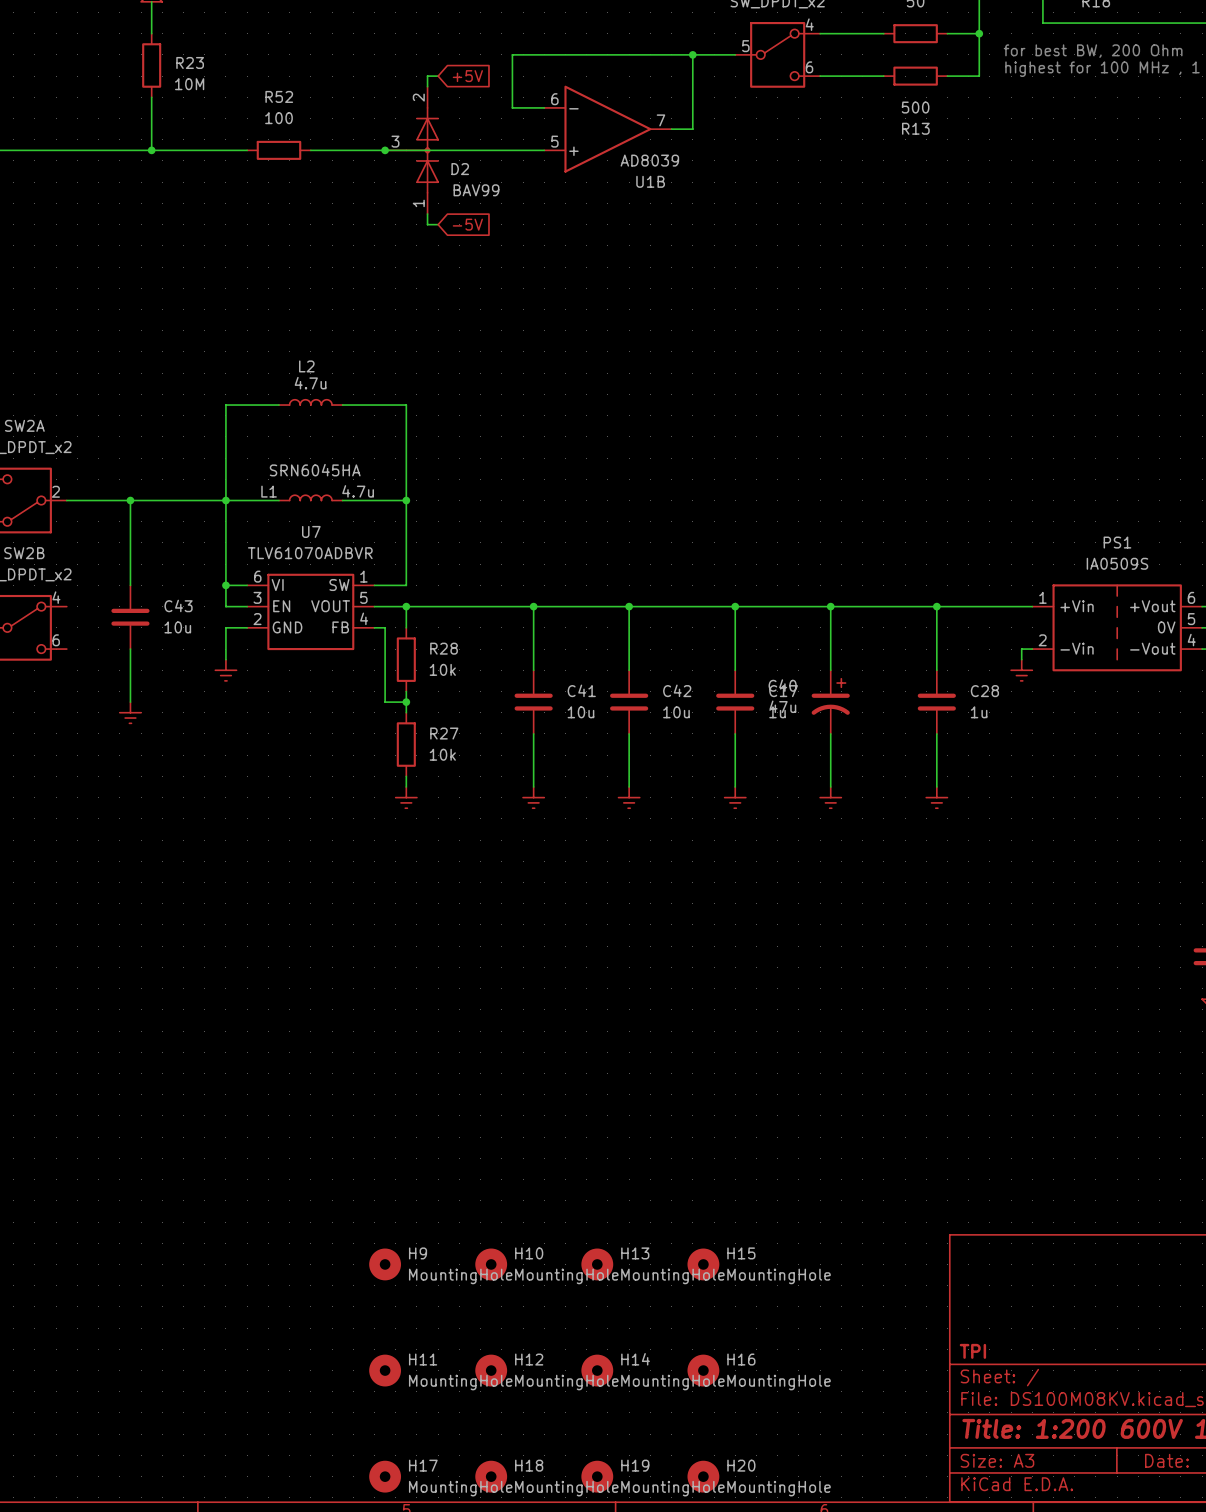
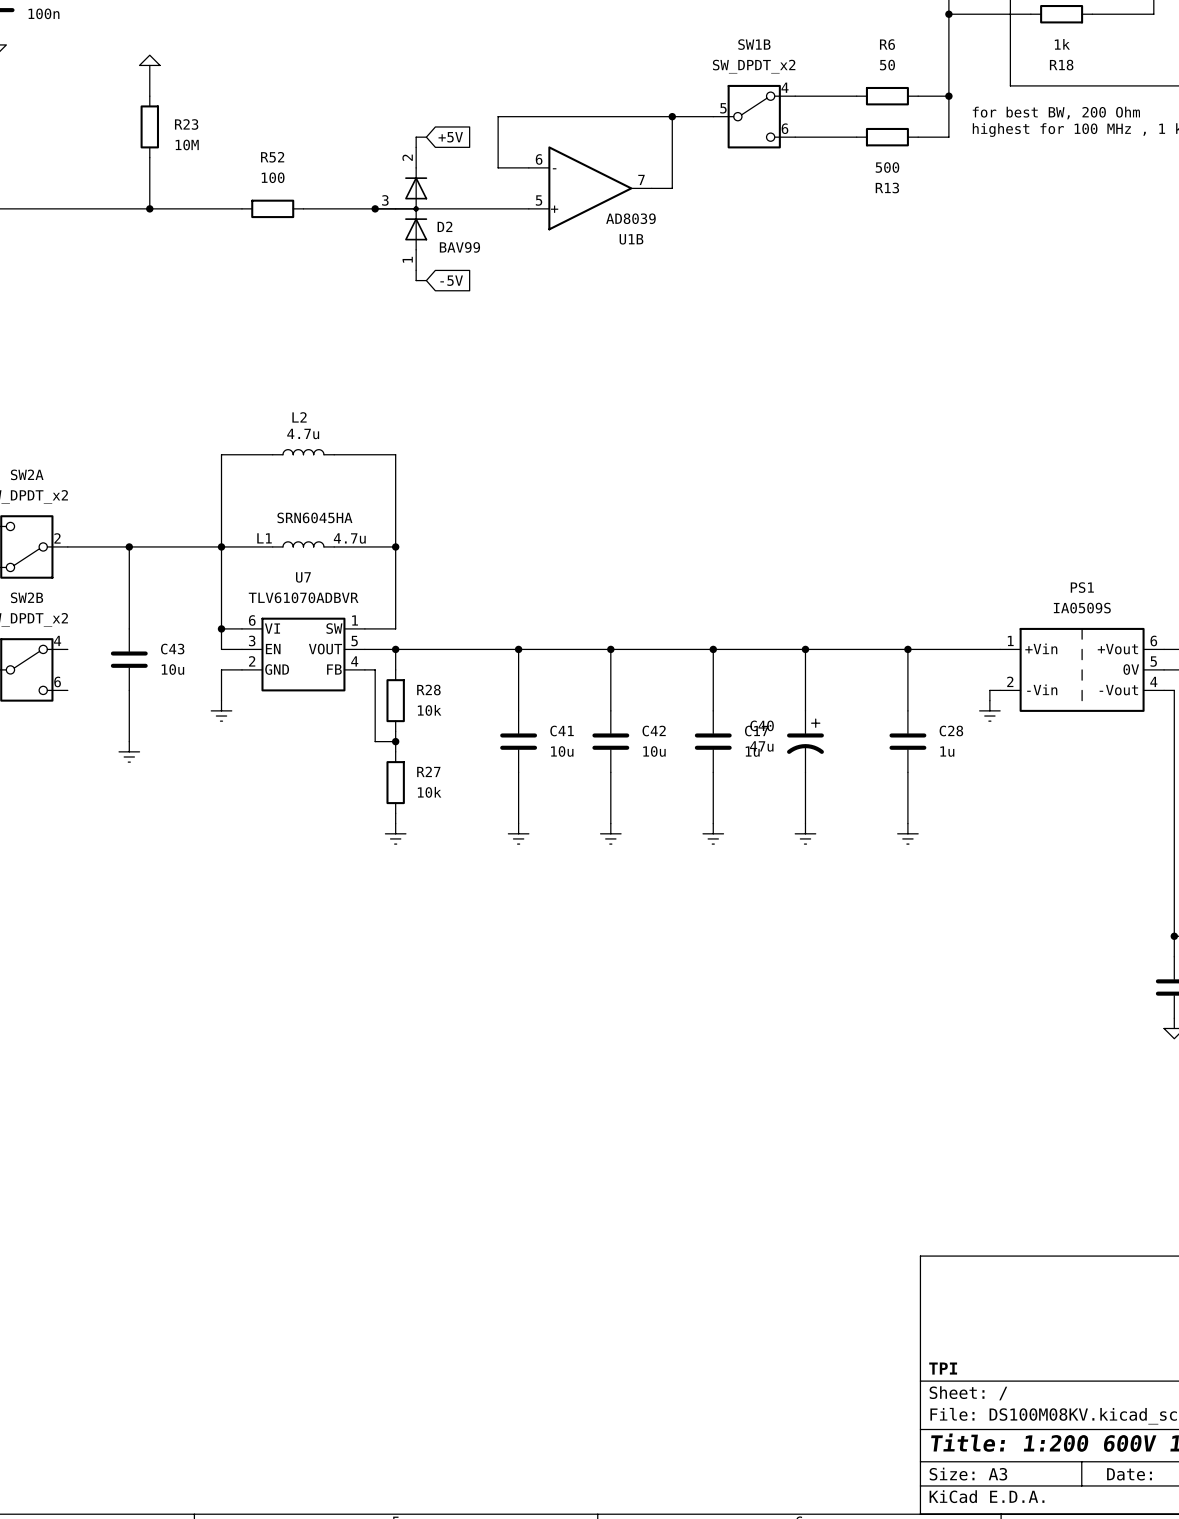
H9: MountingHole (385, 1264) -> none
H10: MountingHole (491, 1264) -> none
H13: MountingHole (597, 1264) -> none
H15: MountingHole (703, 1264) -> none
H11: MountingHole (385, 1370) -> none
H12: MountingHole (491, 1370) -> none
H14: MountingHole (597, 1370) -> none
H16: MountingHole (703, 1370) -> none
H17: MountingHole (385, 1476) -> none
H18: MountingHole (491, 1476) -> none
H19: MountingHole (597, 1476) -> none
H20: MountingHole (703, 1476) -> none

